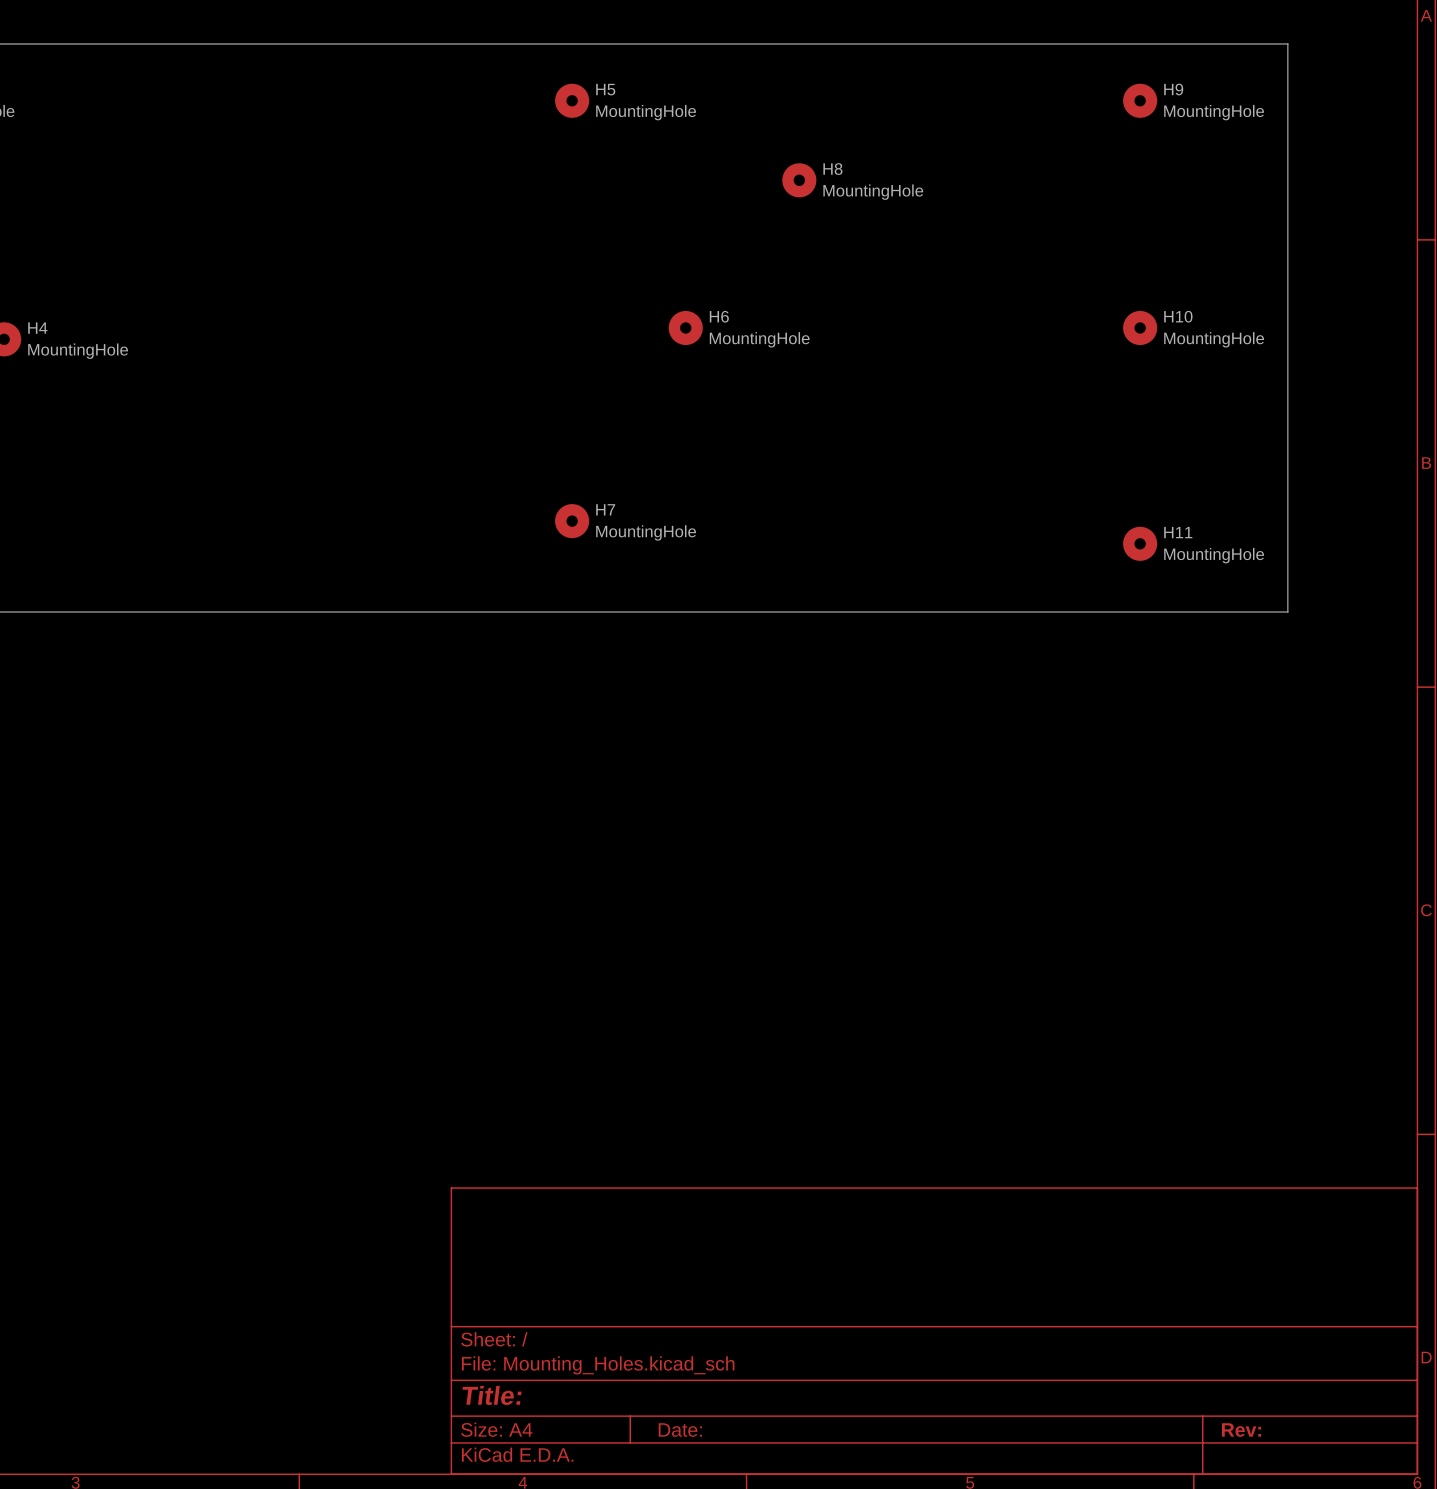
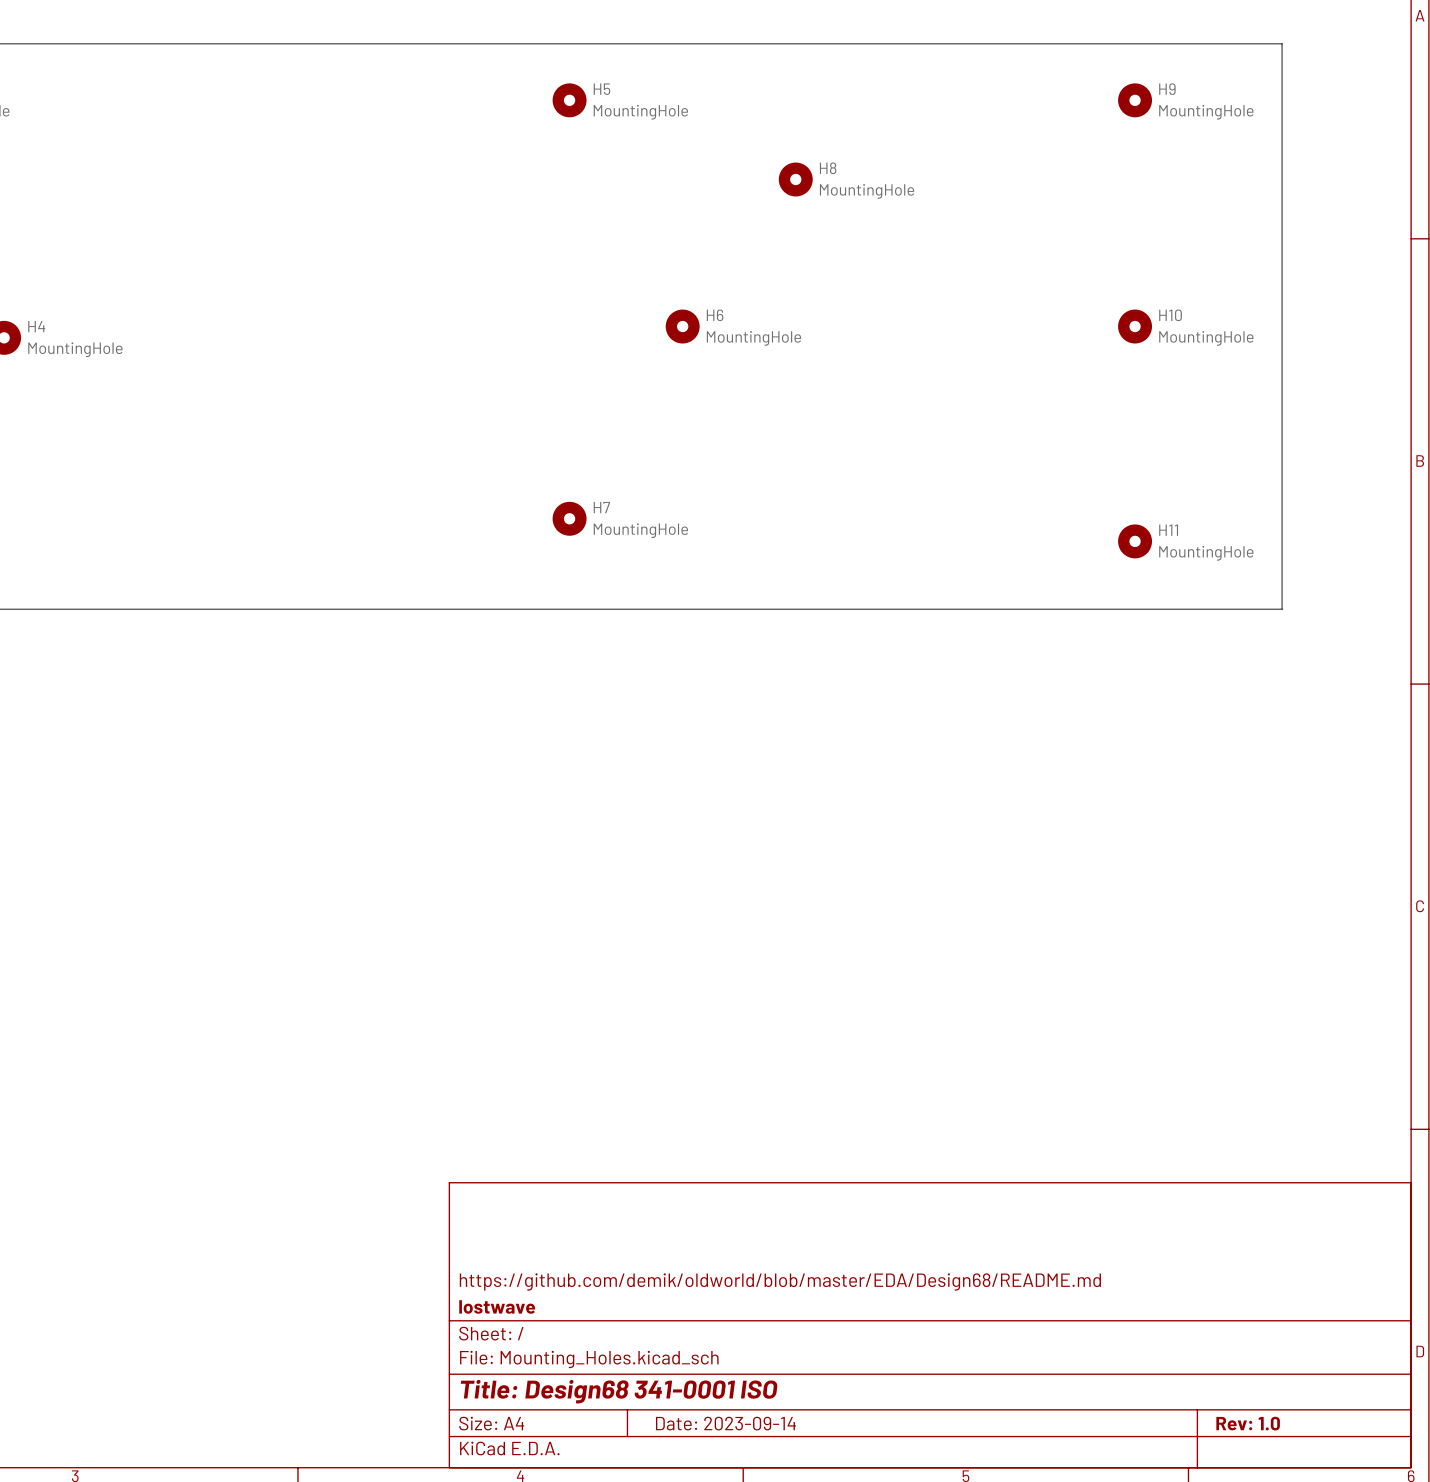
title block: none -> https://github.com/demik/oldworld/blob/master/EDA/Design68/README.md (780, 1282)
title block: none -> lostwave (497, 1306)
title block: Title: (492, 1395) -> Title: Design68 341-0001 ISO (619, 1391)
title block: Date: (680, 1430) -> Date: 2023-09-14 (725, 1423)
title block: Rev: (1241, 1430) -> Rev: 1.0 (1248, 1423)

